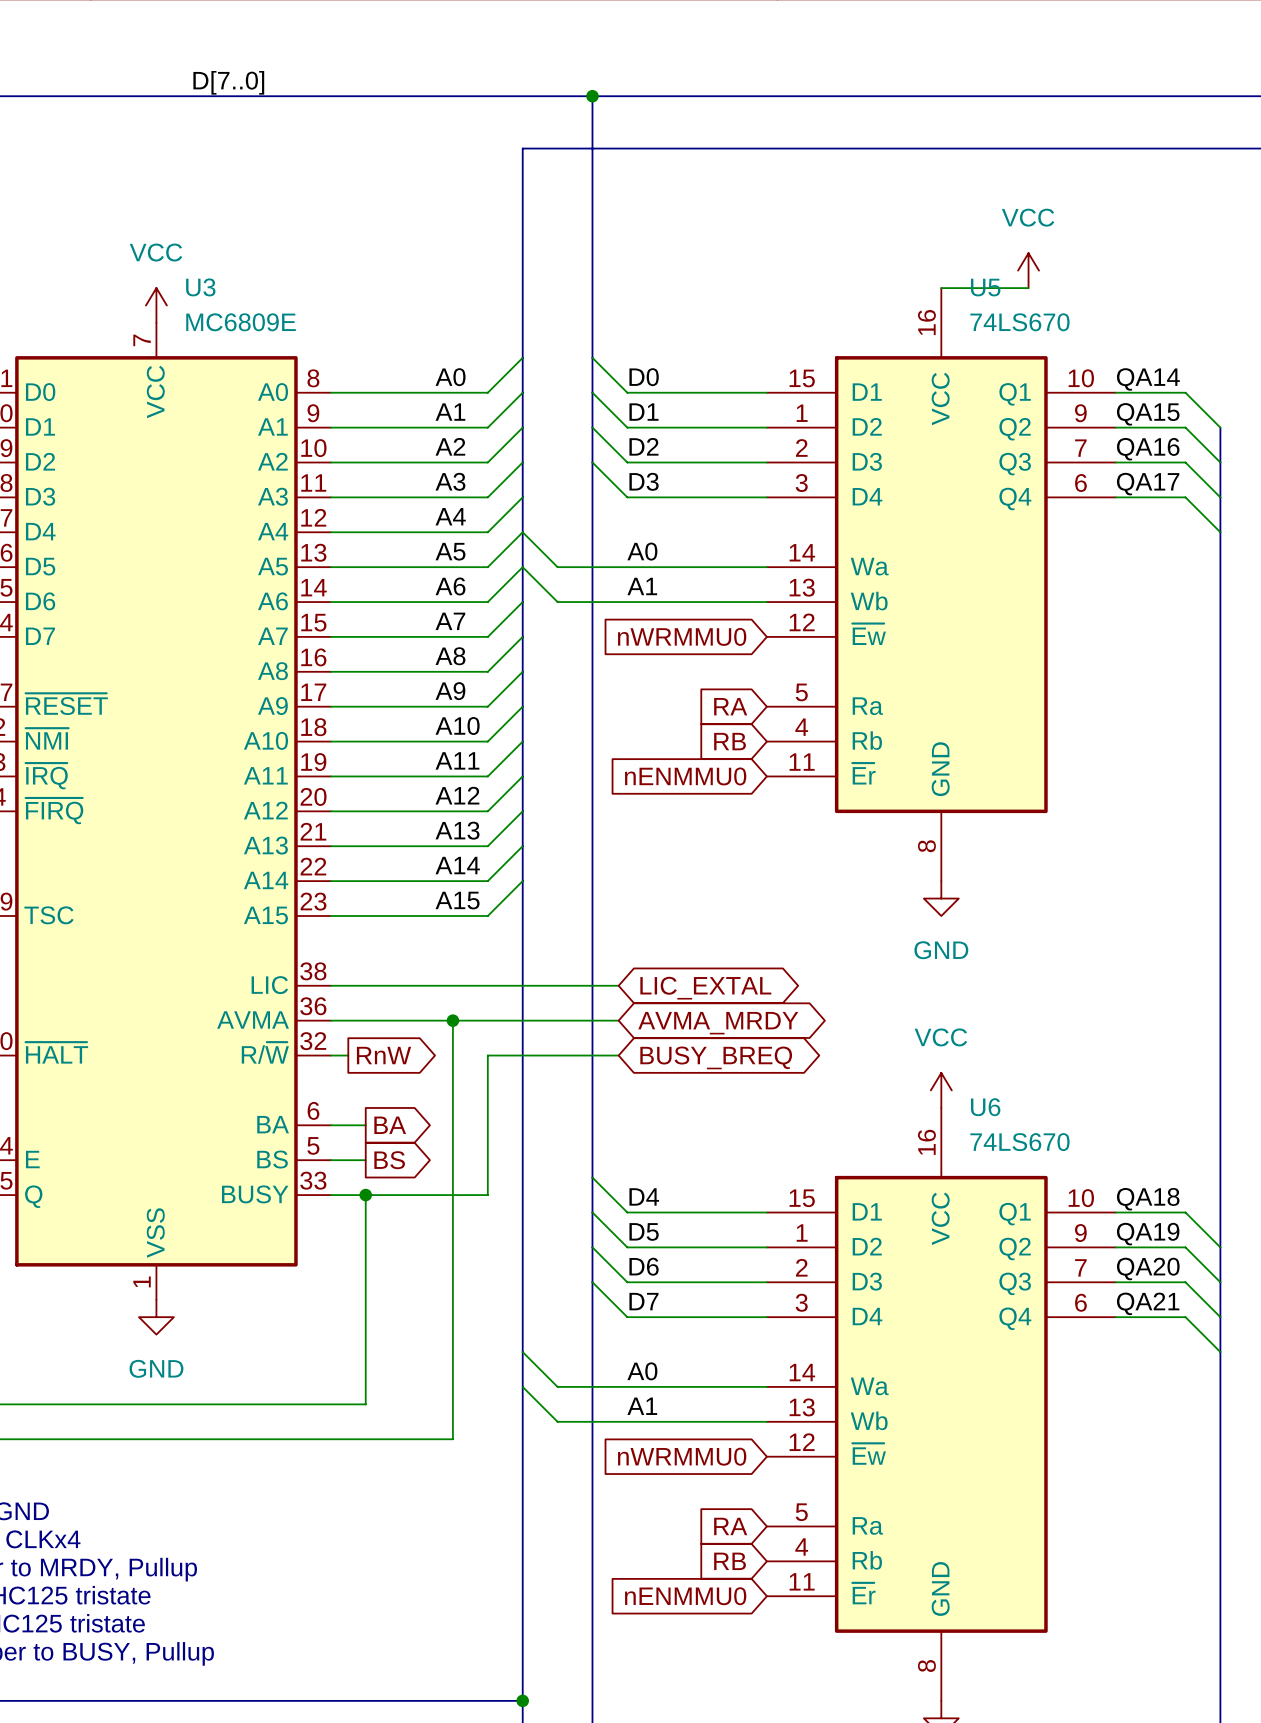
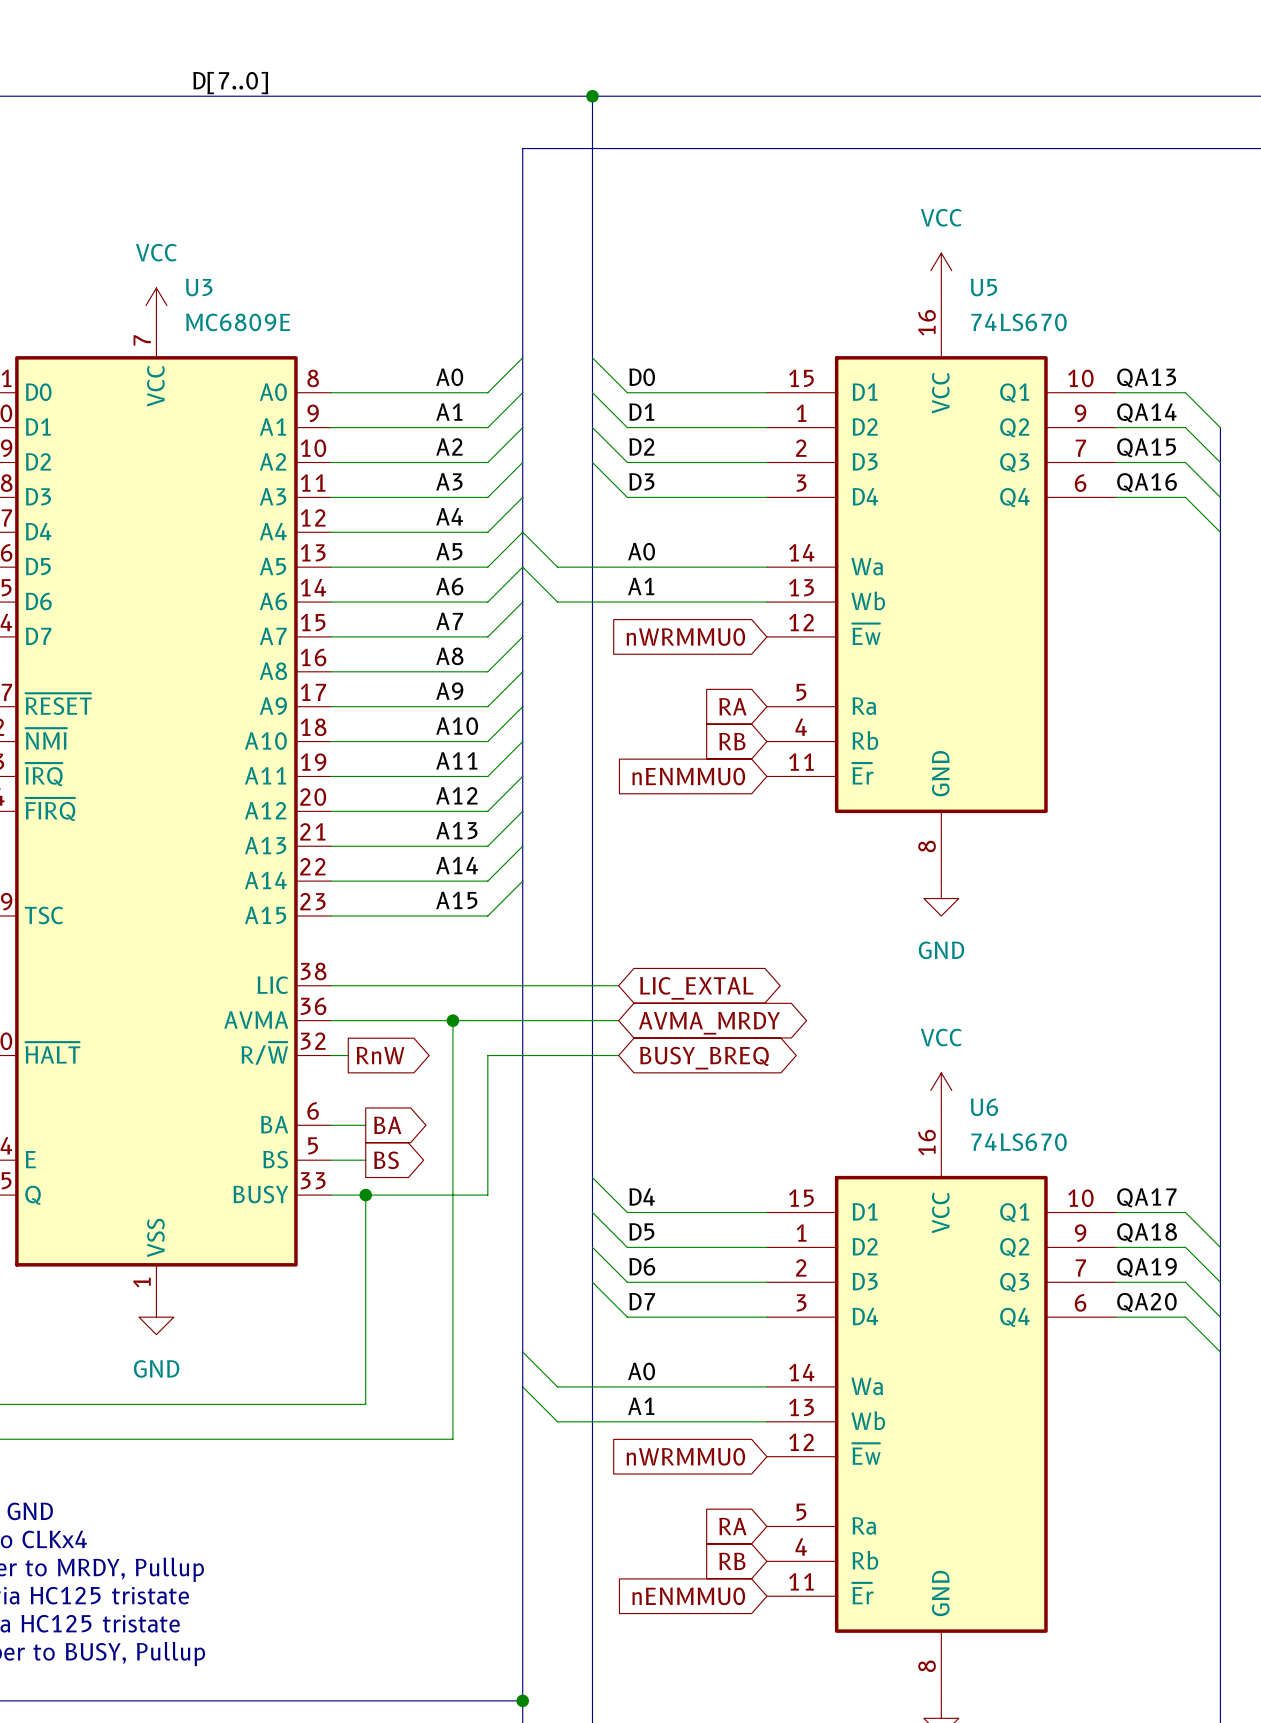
power symbol position: VCC (1028, 270) -> VCC (941, 270)
wire: (941, 288) (1028, 288) -> none
label: QA14 (1148, 379) -> QA13 (1146, 378)
label: QA15 (1148, 414) -> QA14 (1146, 412)
label: QA16 (1148, 449) -> QA15 (1146, 447)
label: QA17 (1148, 484) -> QA16 (1147, 482)
label: QA18 (1148, 1199) -> QA17 (1146, 1197)
label: QA19 (1148, 1234) -> QA18 (1147, 1232)
label: QA20 (1148, 1268) -> QA19 (1146, 1267)
label: QA21 (1148, 1303) -> QA20 (1146, 1302)

